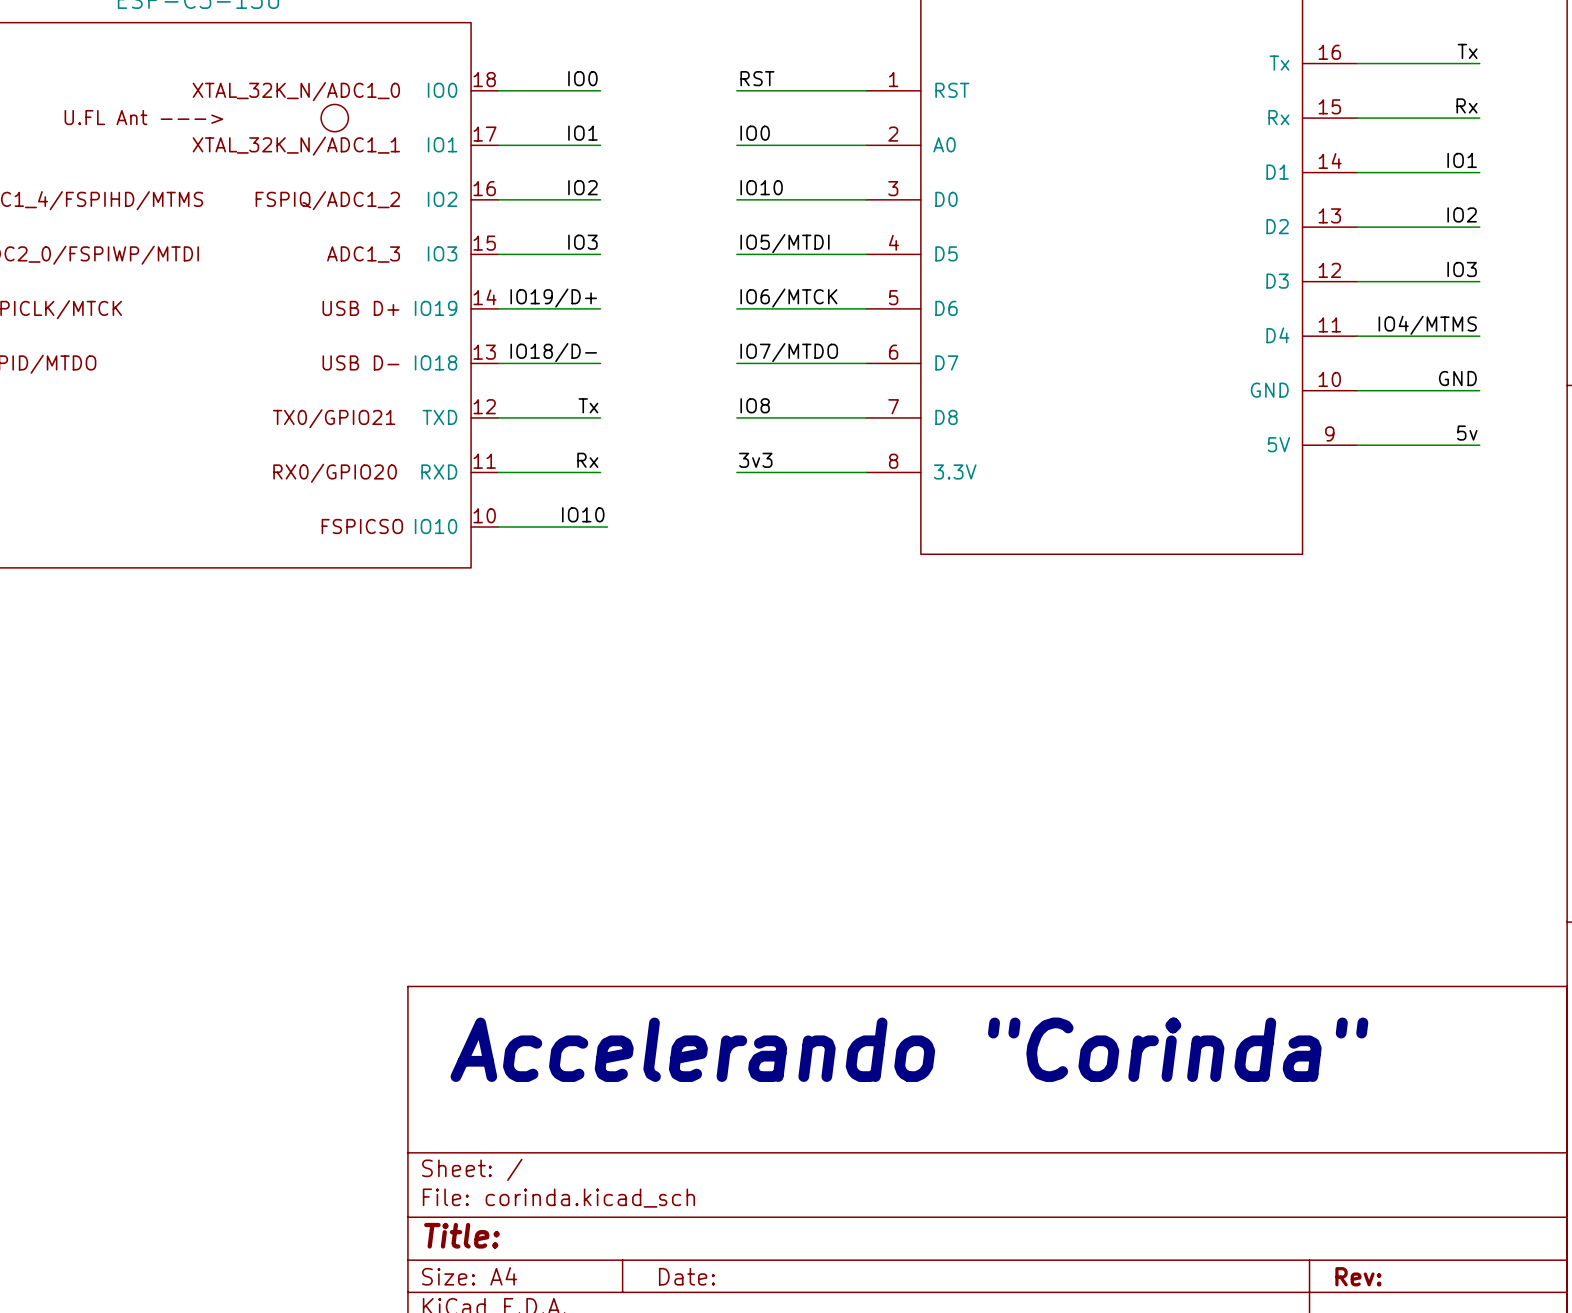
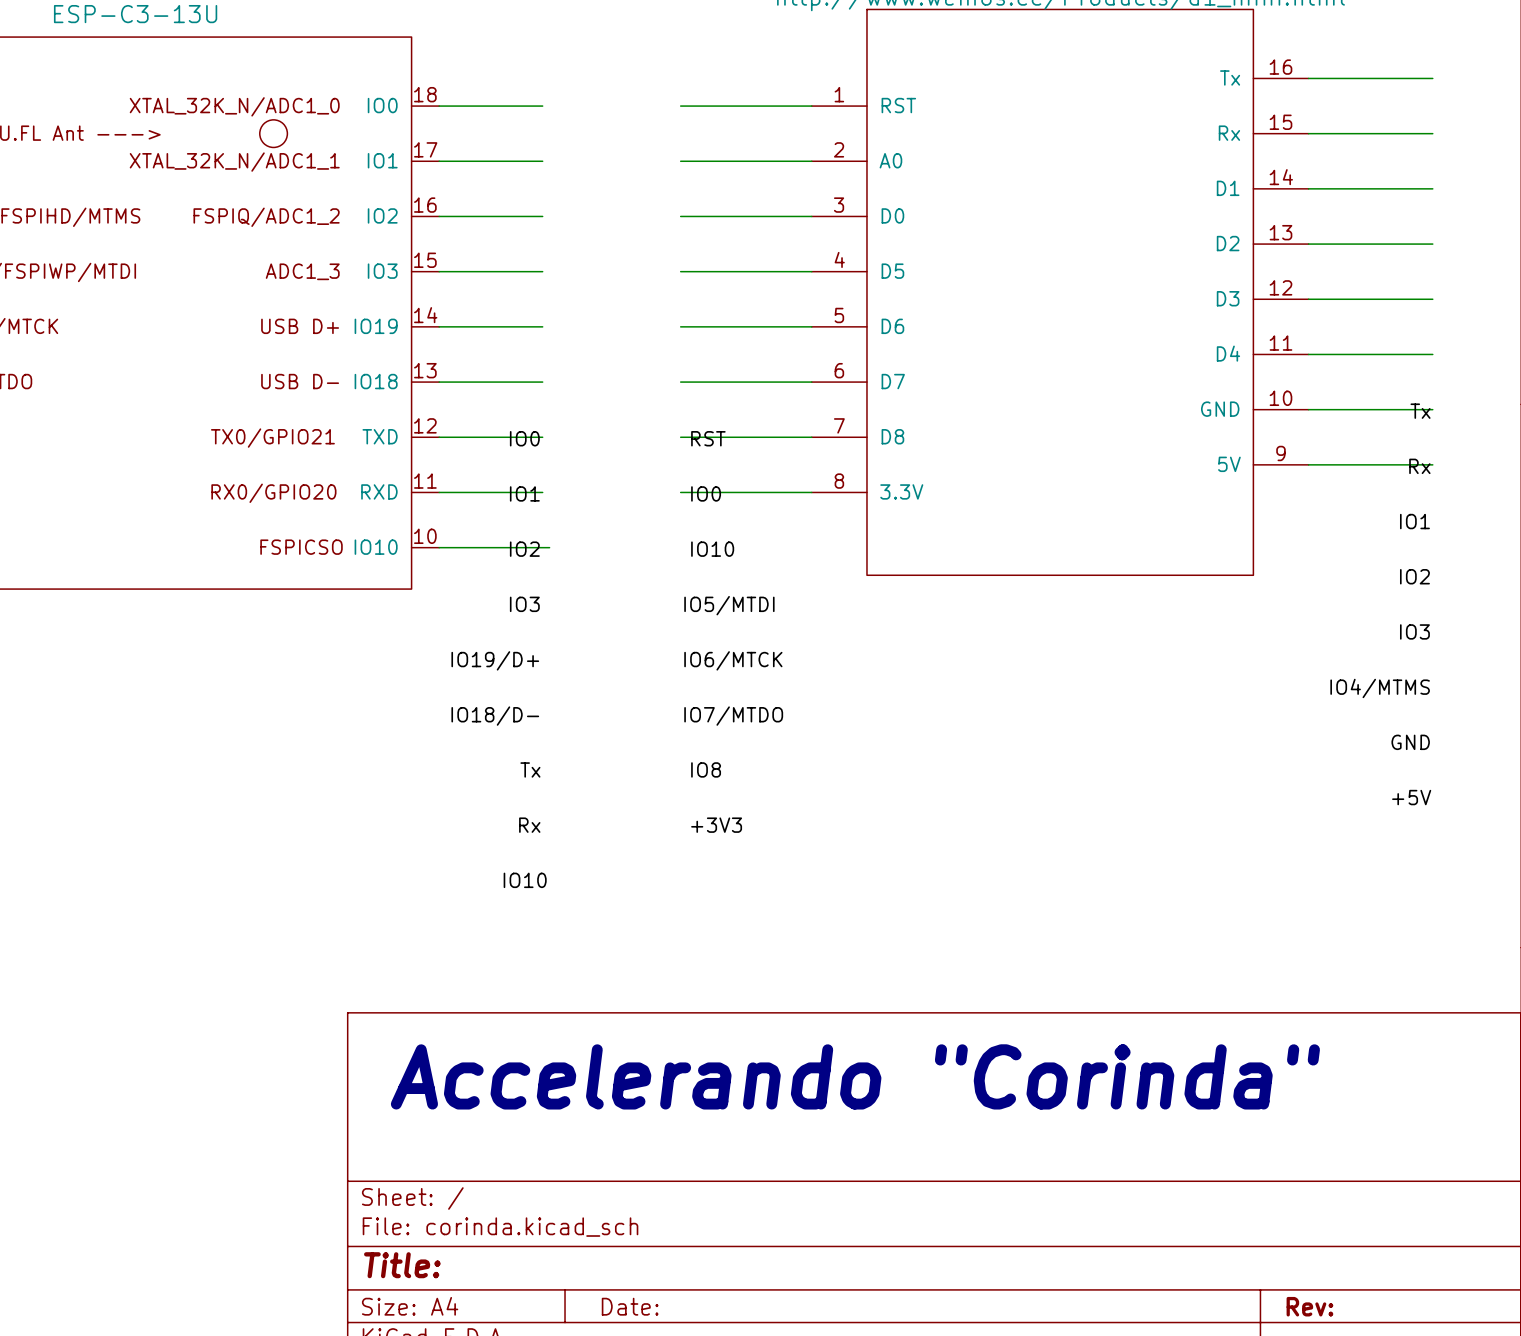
label: Tx (1467, 51) -> none
label: IO0 (582, 78) -> none
label: RST (757, 78) -> none
label: Rx (1466, 105) -> none
label: IO1 (582, 133) -> none
label: IO0 (755, 133) -> none
label: IO1 (1462, 160) -> none
label: IO2 (582, 187) -> none
label: IO10 (761, 187) -> none
label: IO2 (1462, 214) -> none
label: IO3 (582, 242) -> none
label: IO5/MTDI (785, 243) -> none
label: IO3 (1462, 269) -> none
label: IO19/D+ (553, 298) -> none
label: IO6/MTCK (788, 298) -> none
label: IO4/MTMS (1427, 325) -> none
label: IO18/D- (553, 352) -> none
label: IO7/MTDO (789, 352) -> none
label: GND (1457, 378) -> none
label: none -> Tx (1420, 411)
label: Tx (588, 405) -> none
label: IO8 (755, 405) -> none
label: none -> IO0 (524, 438)
label: none -> RST (708, 438)
label: 5v (1467, 433) -> none
label: none -> Rx (1419, 466)
label: Rx (587, 460) -> none
label: 3v3 (755, 460) -> none
label: none -> IO1 (524, 493)
label: none -> IO0 (706, 493)
label: none -> IO1 (1414, 521)
label position: IO10 (583, 514) -> IO10 (712, 549)
label: none -> IO2 (524, 549)
label: none -> IO2 (1414, 576)
label: none -> IO3 (524, 604)
label: none -> IO5/MTDI (729, 605)
label: none -> IO3 (1414, 631)
label: none -> IO19/D+ (495, 660)
label: none -> IO6/MTCK (733, 660)
label: none -> IO4/MTMS (1380, 688)
label: none -> IO18/D- (495, 716)
label: none -> IO7/MTDO (733, 716)
label: none -> GND (1410, 742)
label: none -> Tx (530, 769)
label: none -> IO8 (706, 769)
label: none -> +5V (1411, 797)
label: none -> Rx (529, 825)
label: none -> +3V3 (716, 825)
label: none -> IO10 (525, 880)

